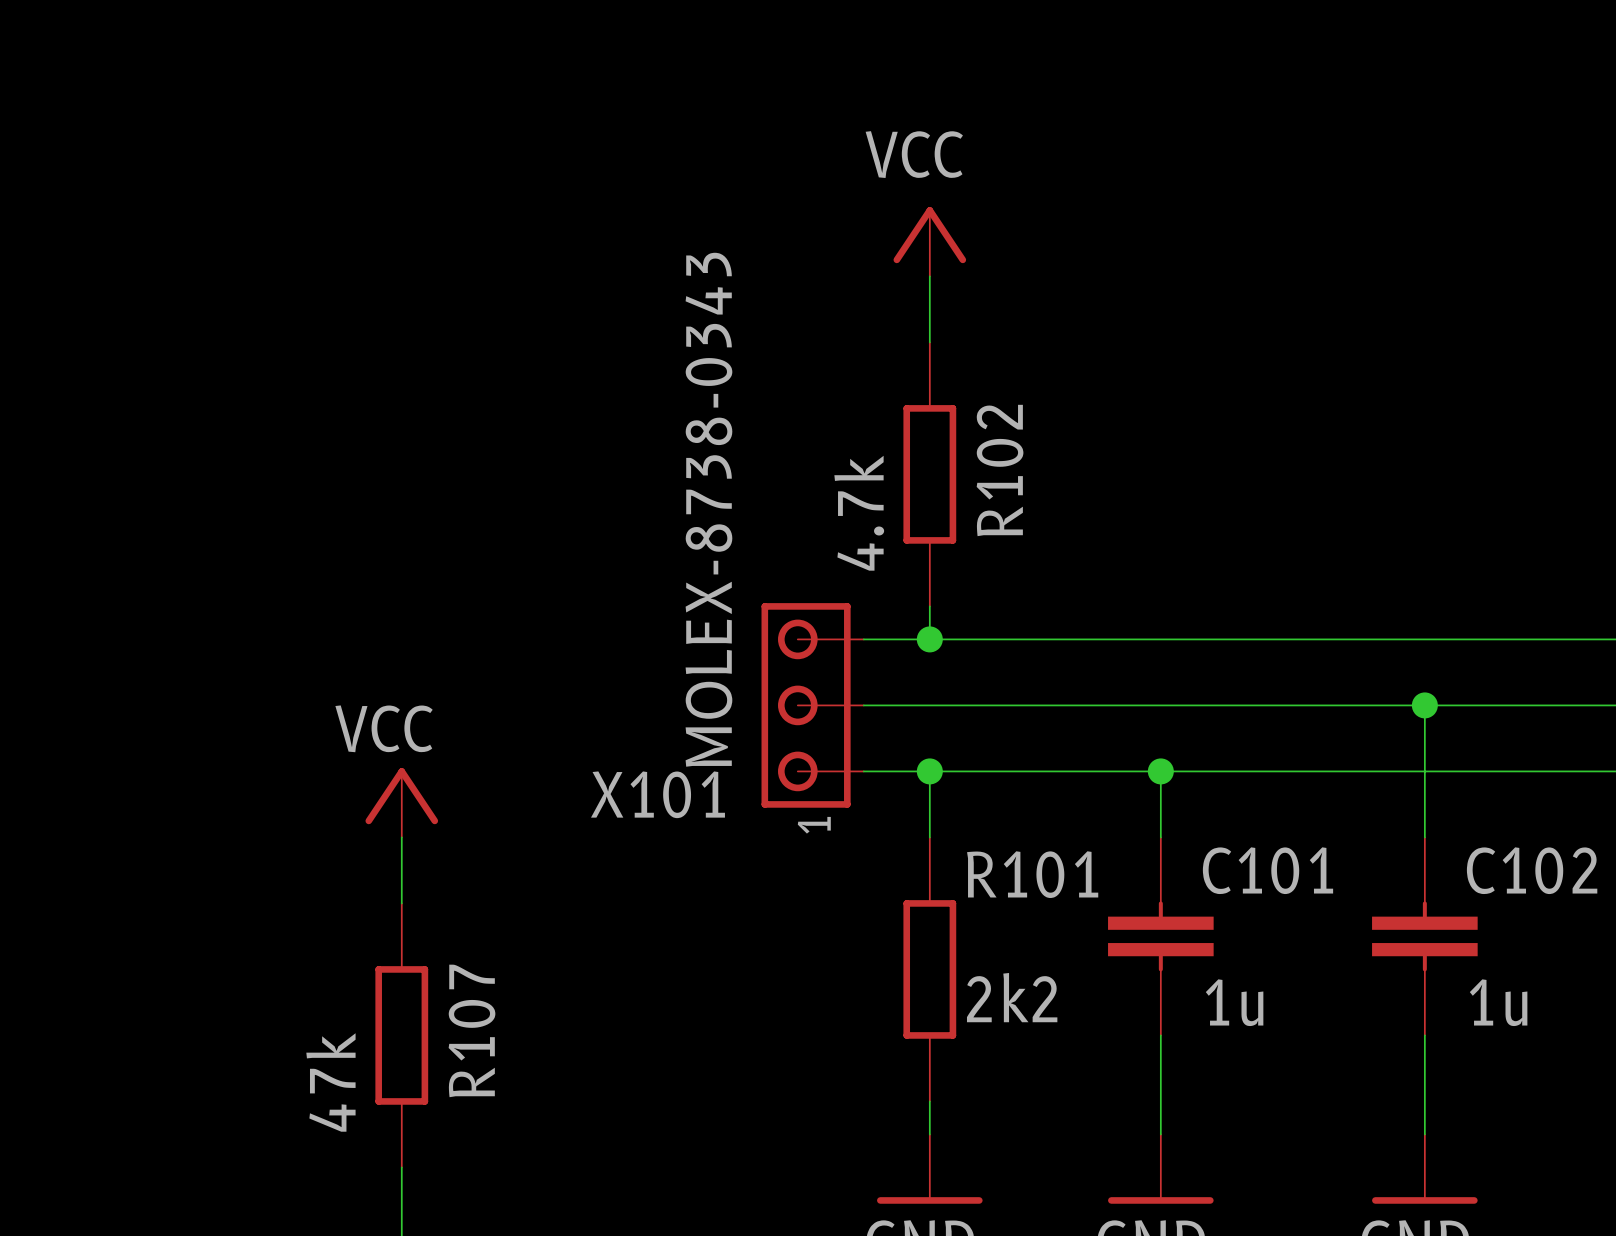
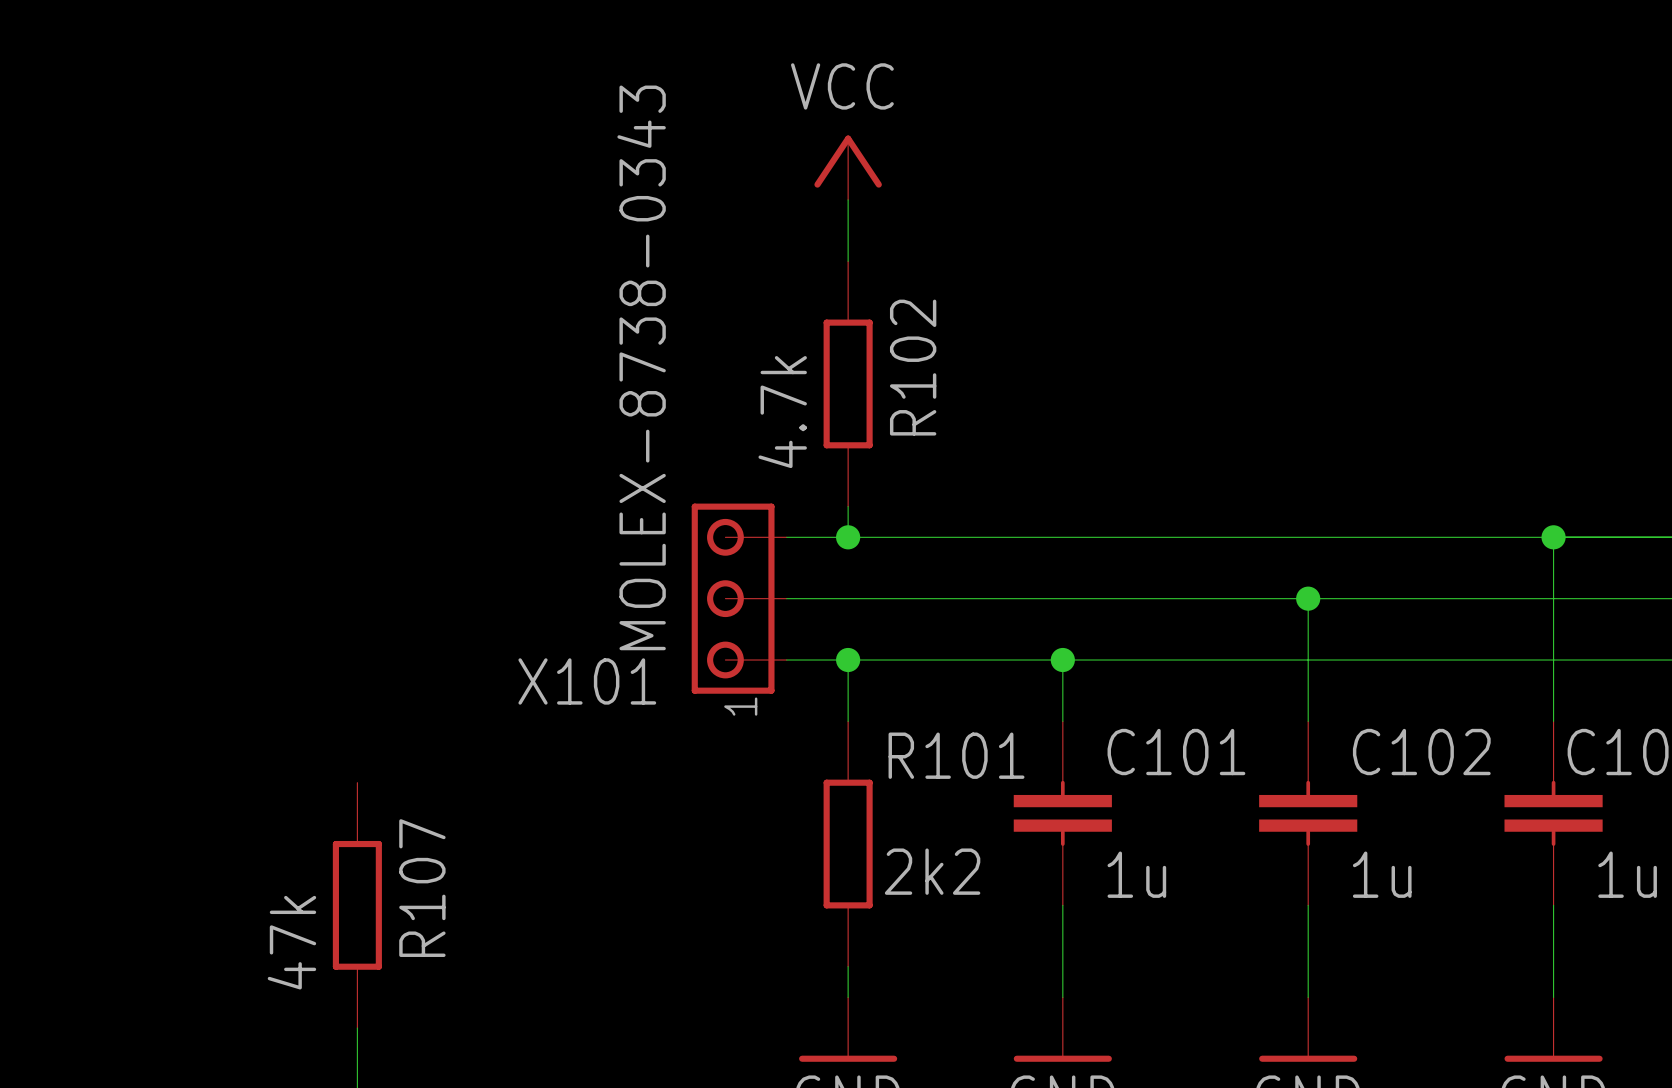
power symbol: VCC (401, 802) -> none
wire: (401, 837) (401, 903) -> none

